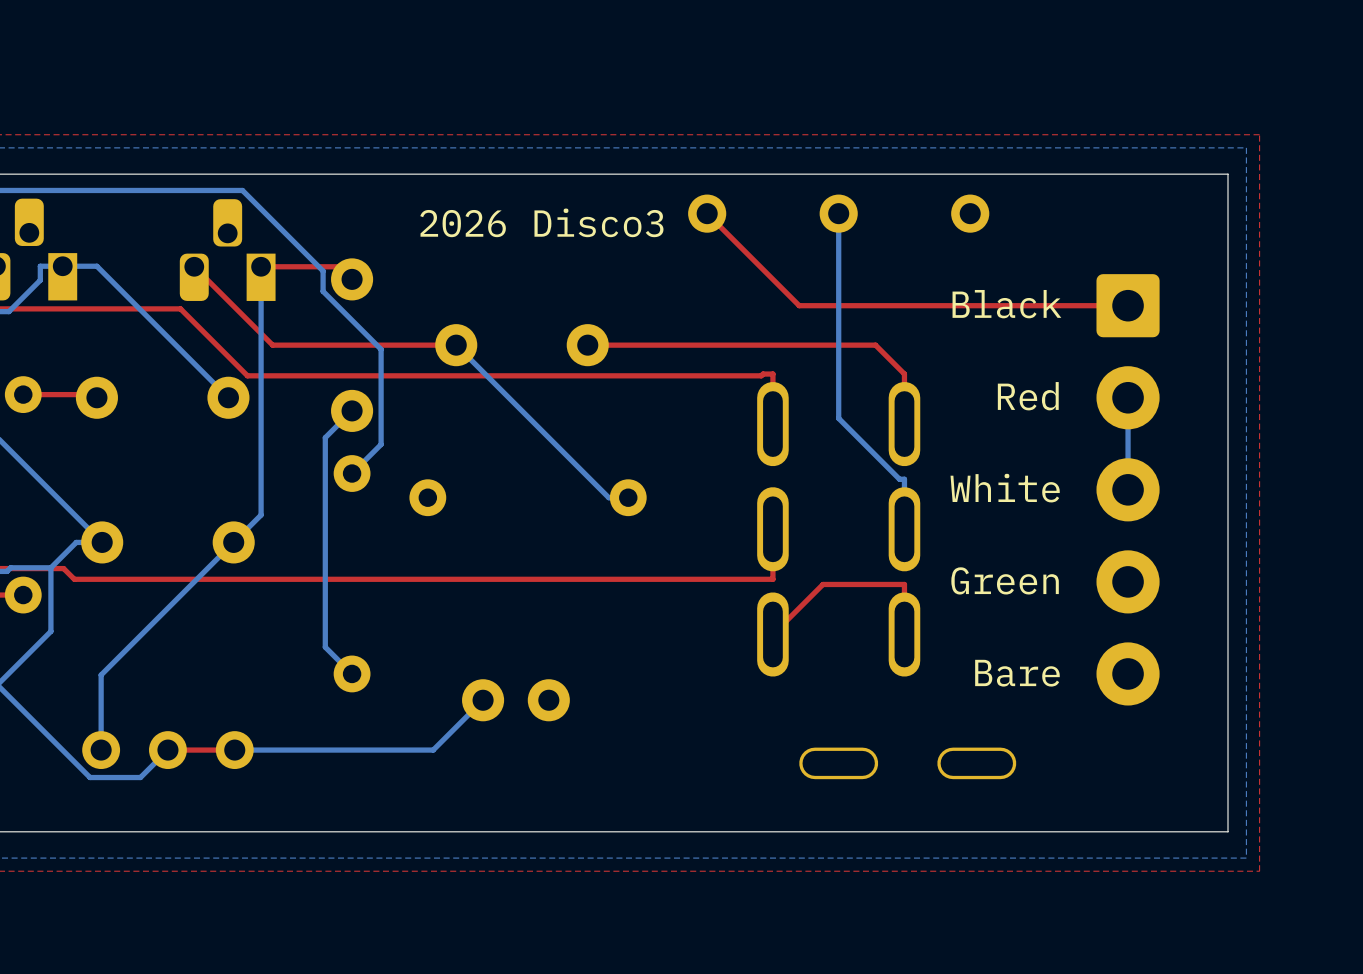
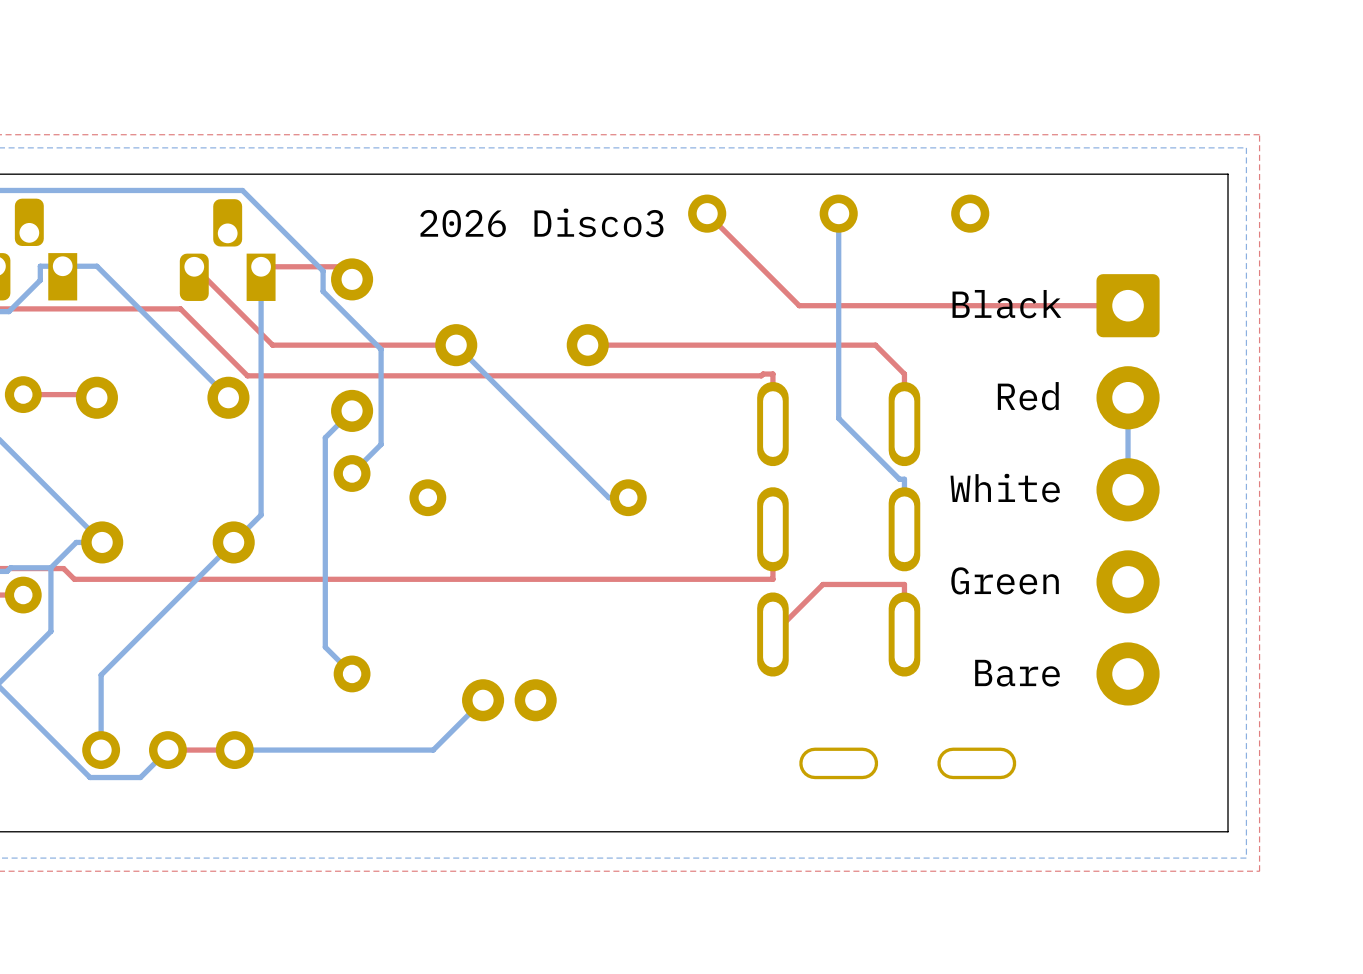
part footprint: [462, 679, 570, 722] -> [462, 679, 557, 722]

